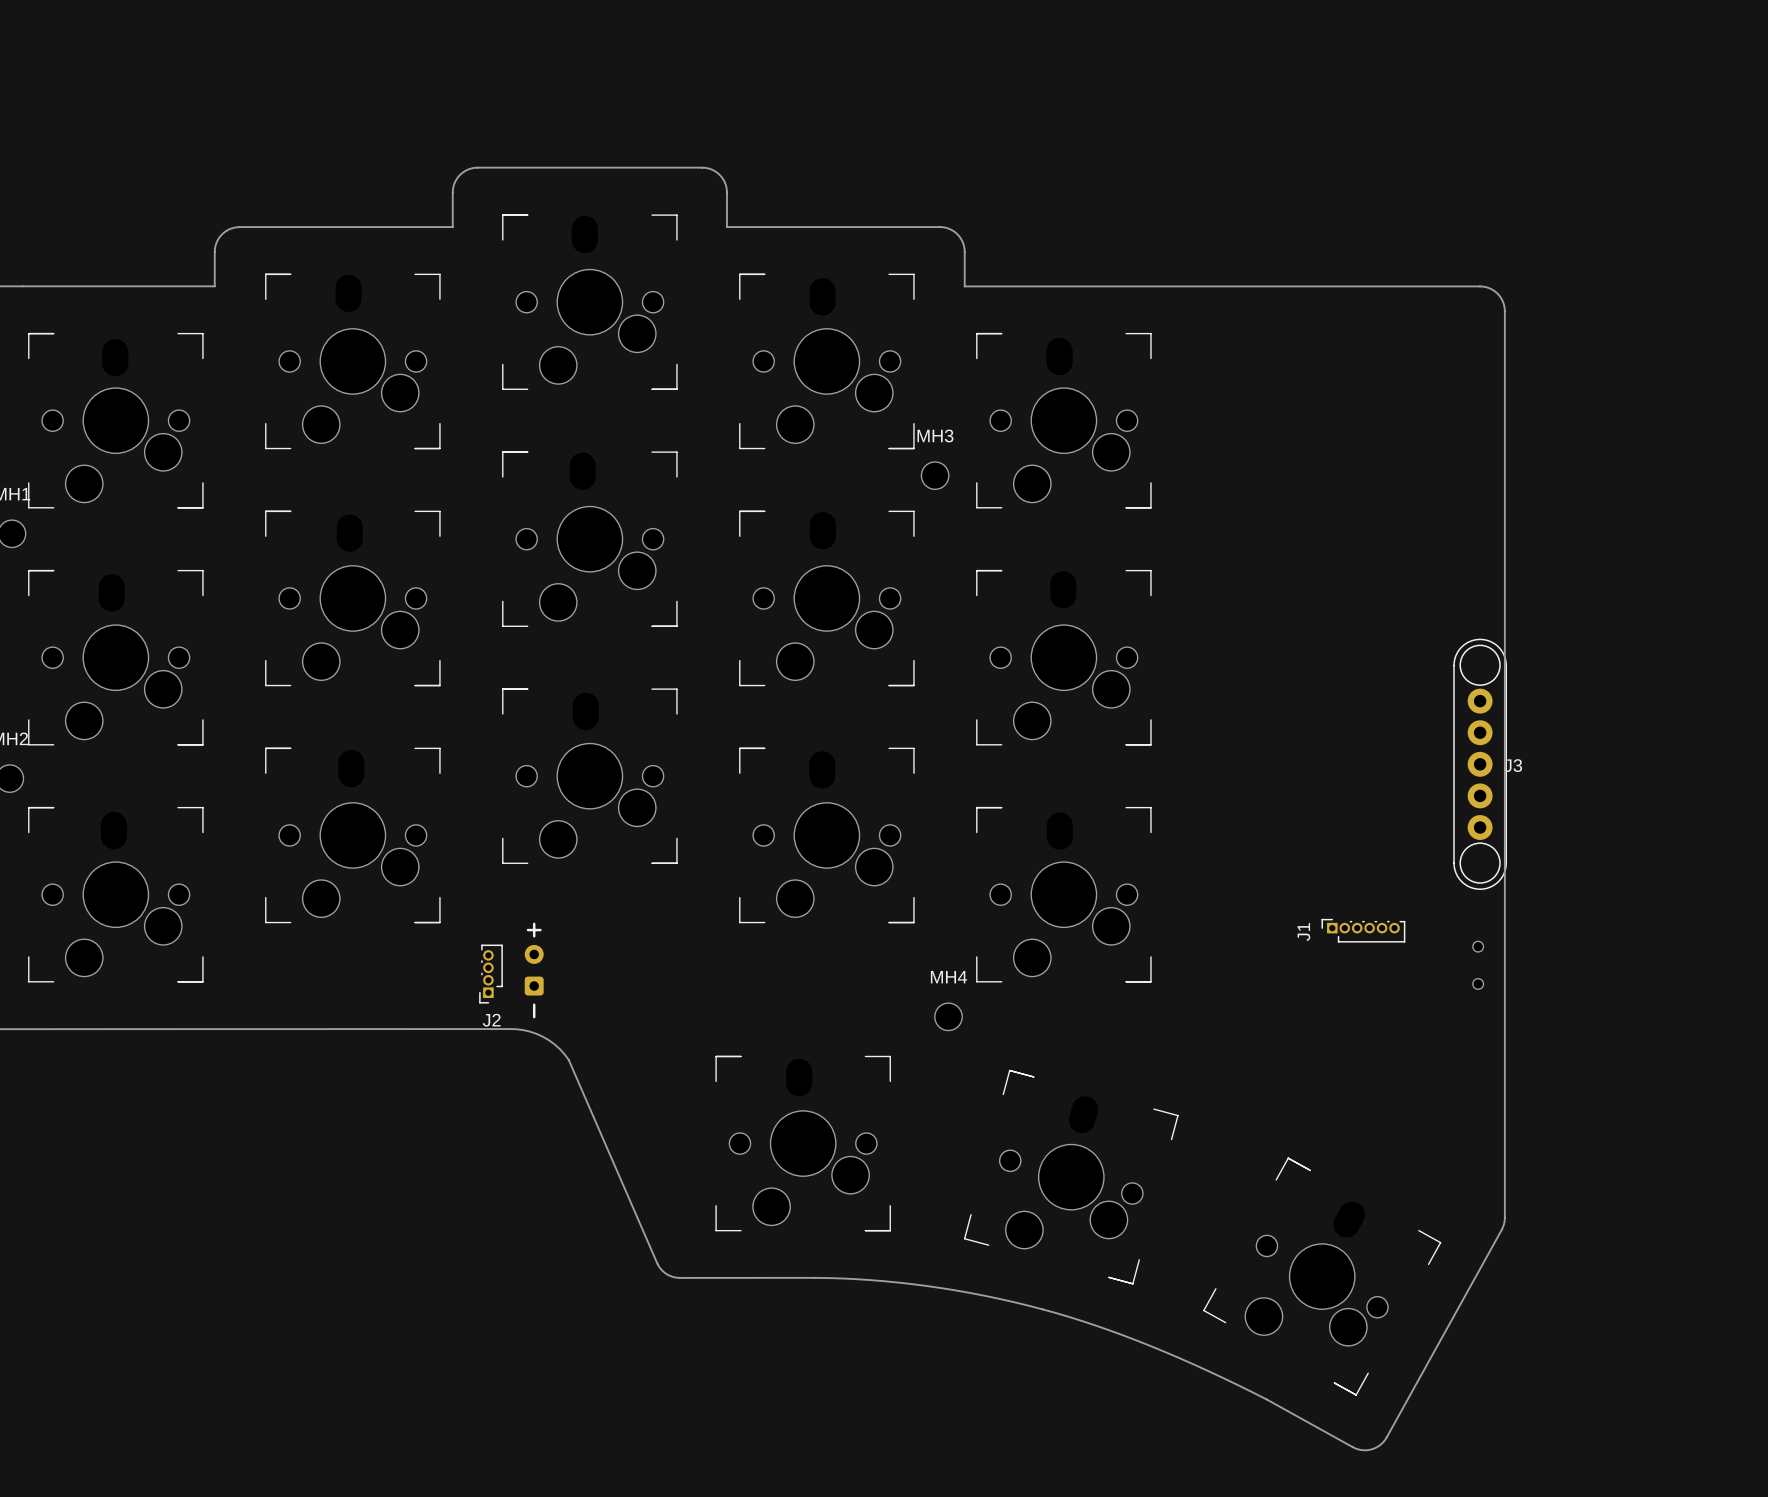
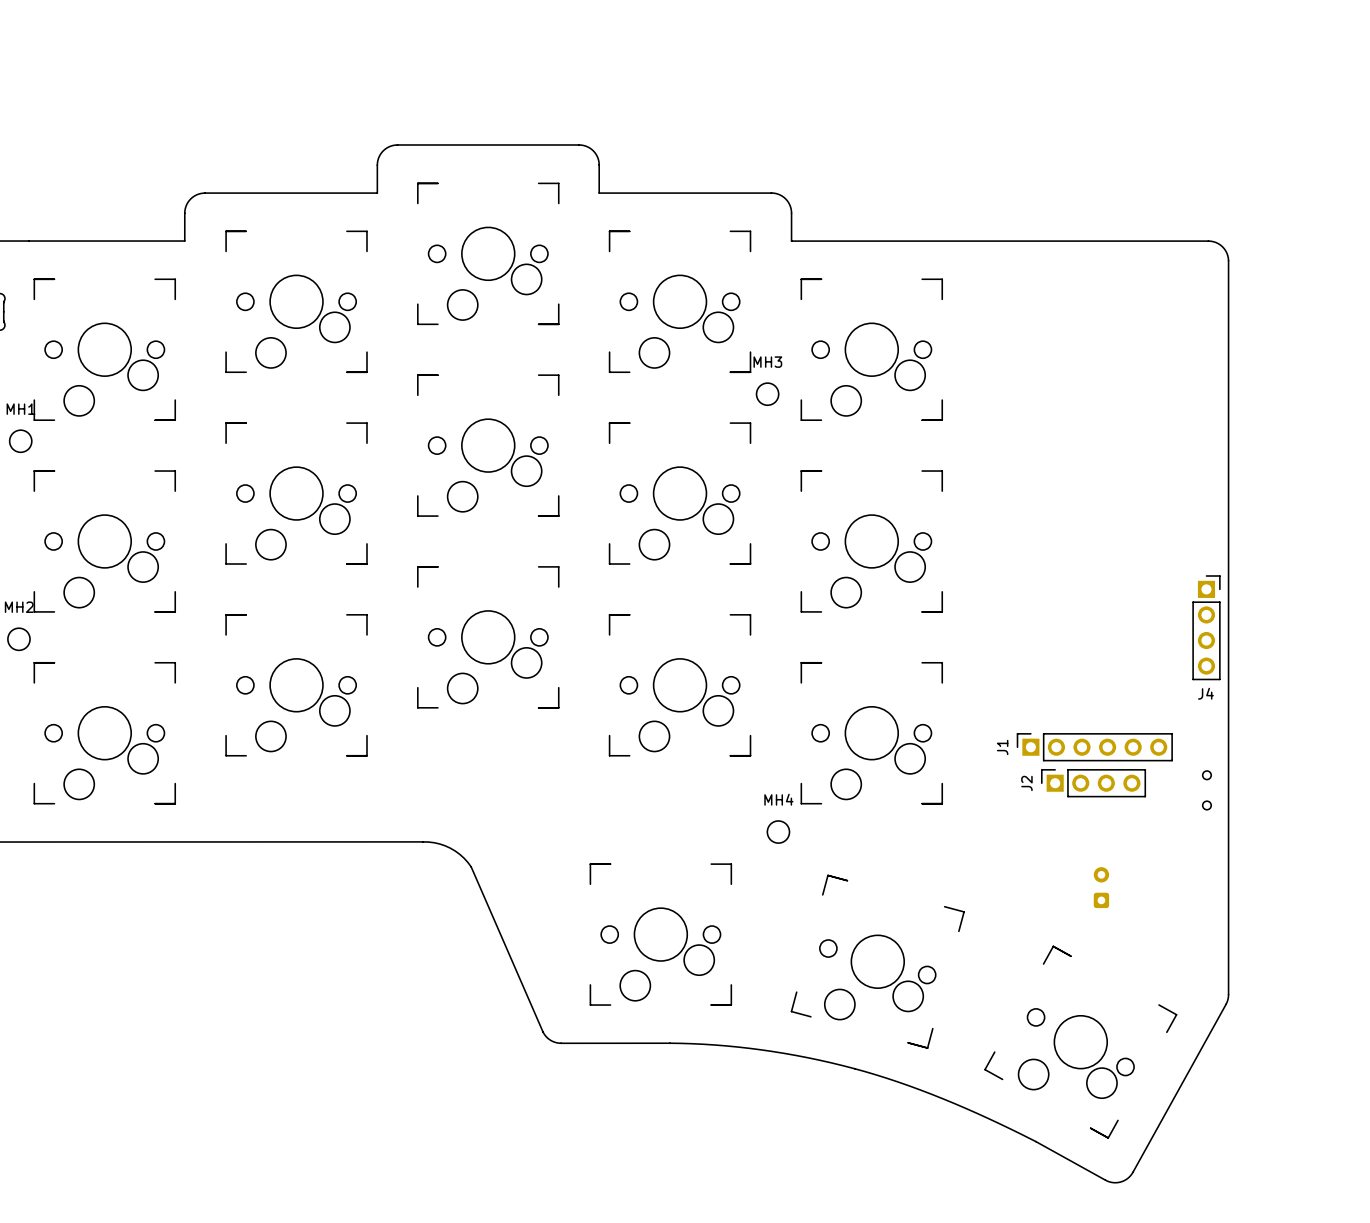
J4: none -> (1206, 627)
J3: (1480, 764) -> none
J1 footprint: [1321, 918, 1406, 943] -> [1016, 733, 1173, 762]
J1 name position: J1 (1303, 932) -> J1 (1002, 747)
J2 footprint: [479, 944, 503, 1004] -> [1041, 769, 1146, 798]
part: (534, 970) -> none
J2 name position: J2 (491, 1020) -> J2 (1026, 783)
part: none -> (1101, 887)

